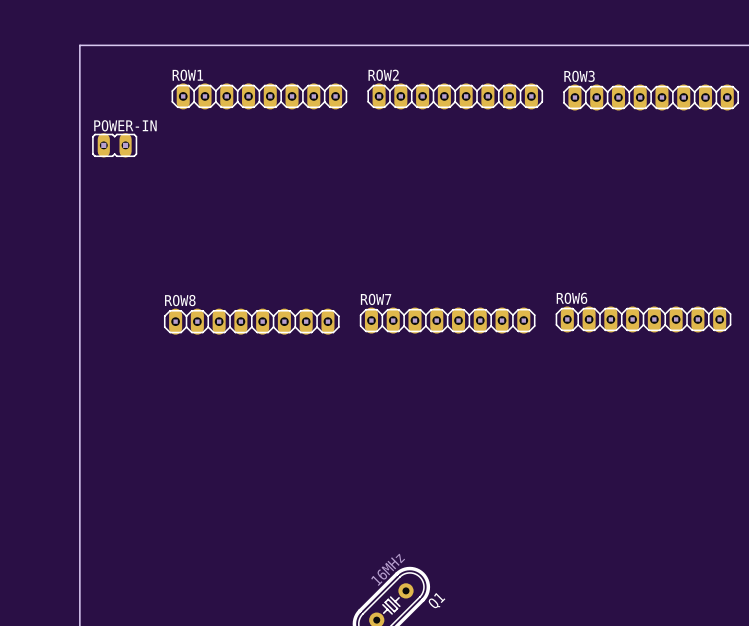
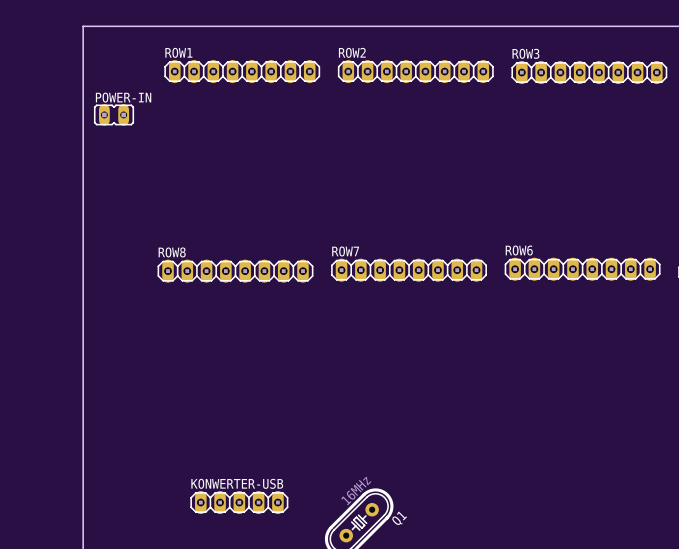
KONWERTER-USB: none -> (239, 502)

